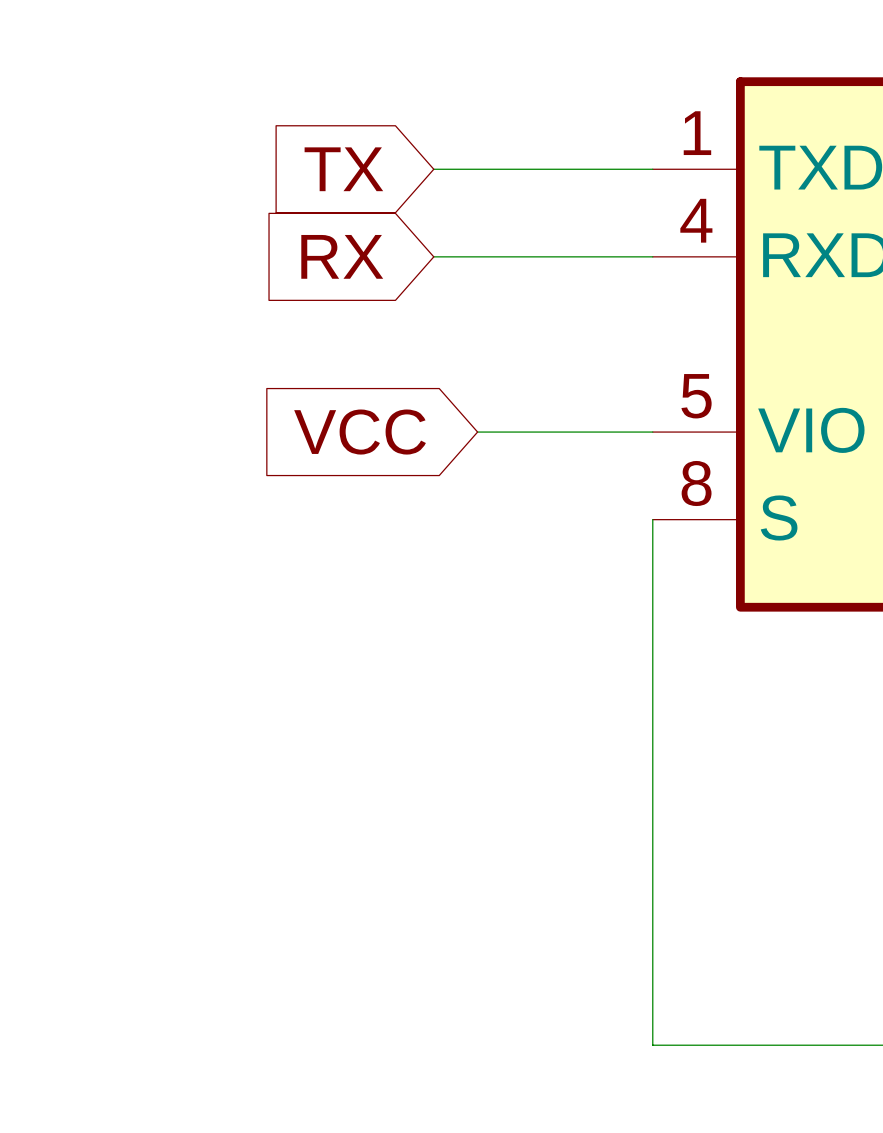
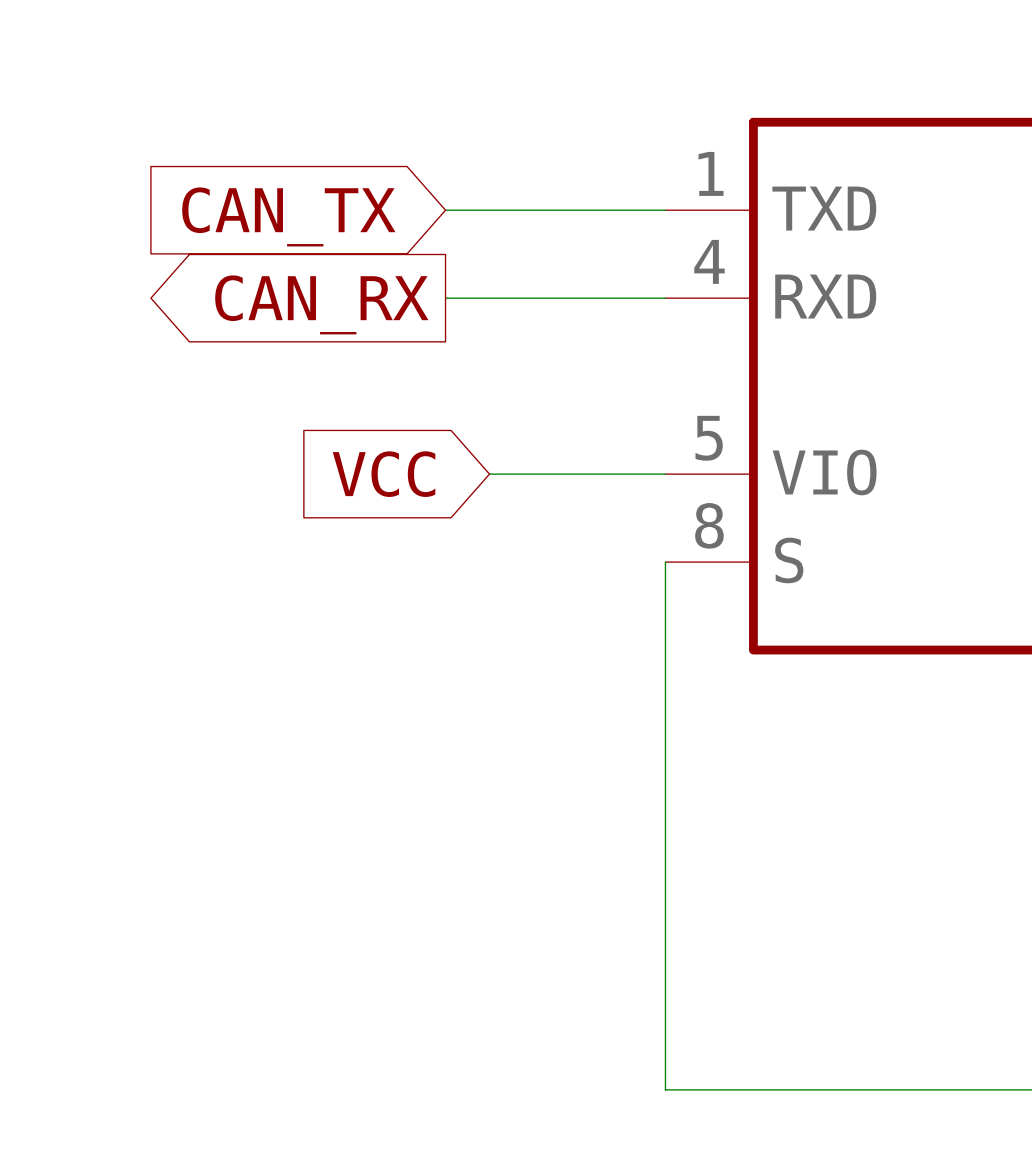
global label: TX (343, 169) -> CAN_TX (288, 216)
global label shape: input (342, 256) -> output (321, 304)
global label: RX (342, 256) -> CAN_RX (321, 304)

